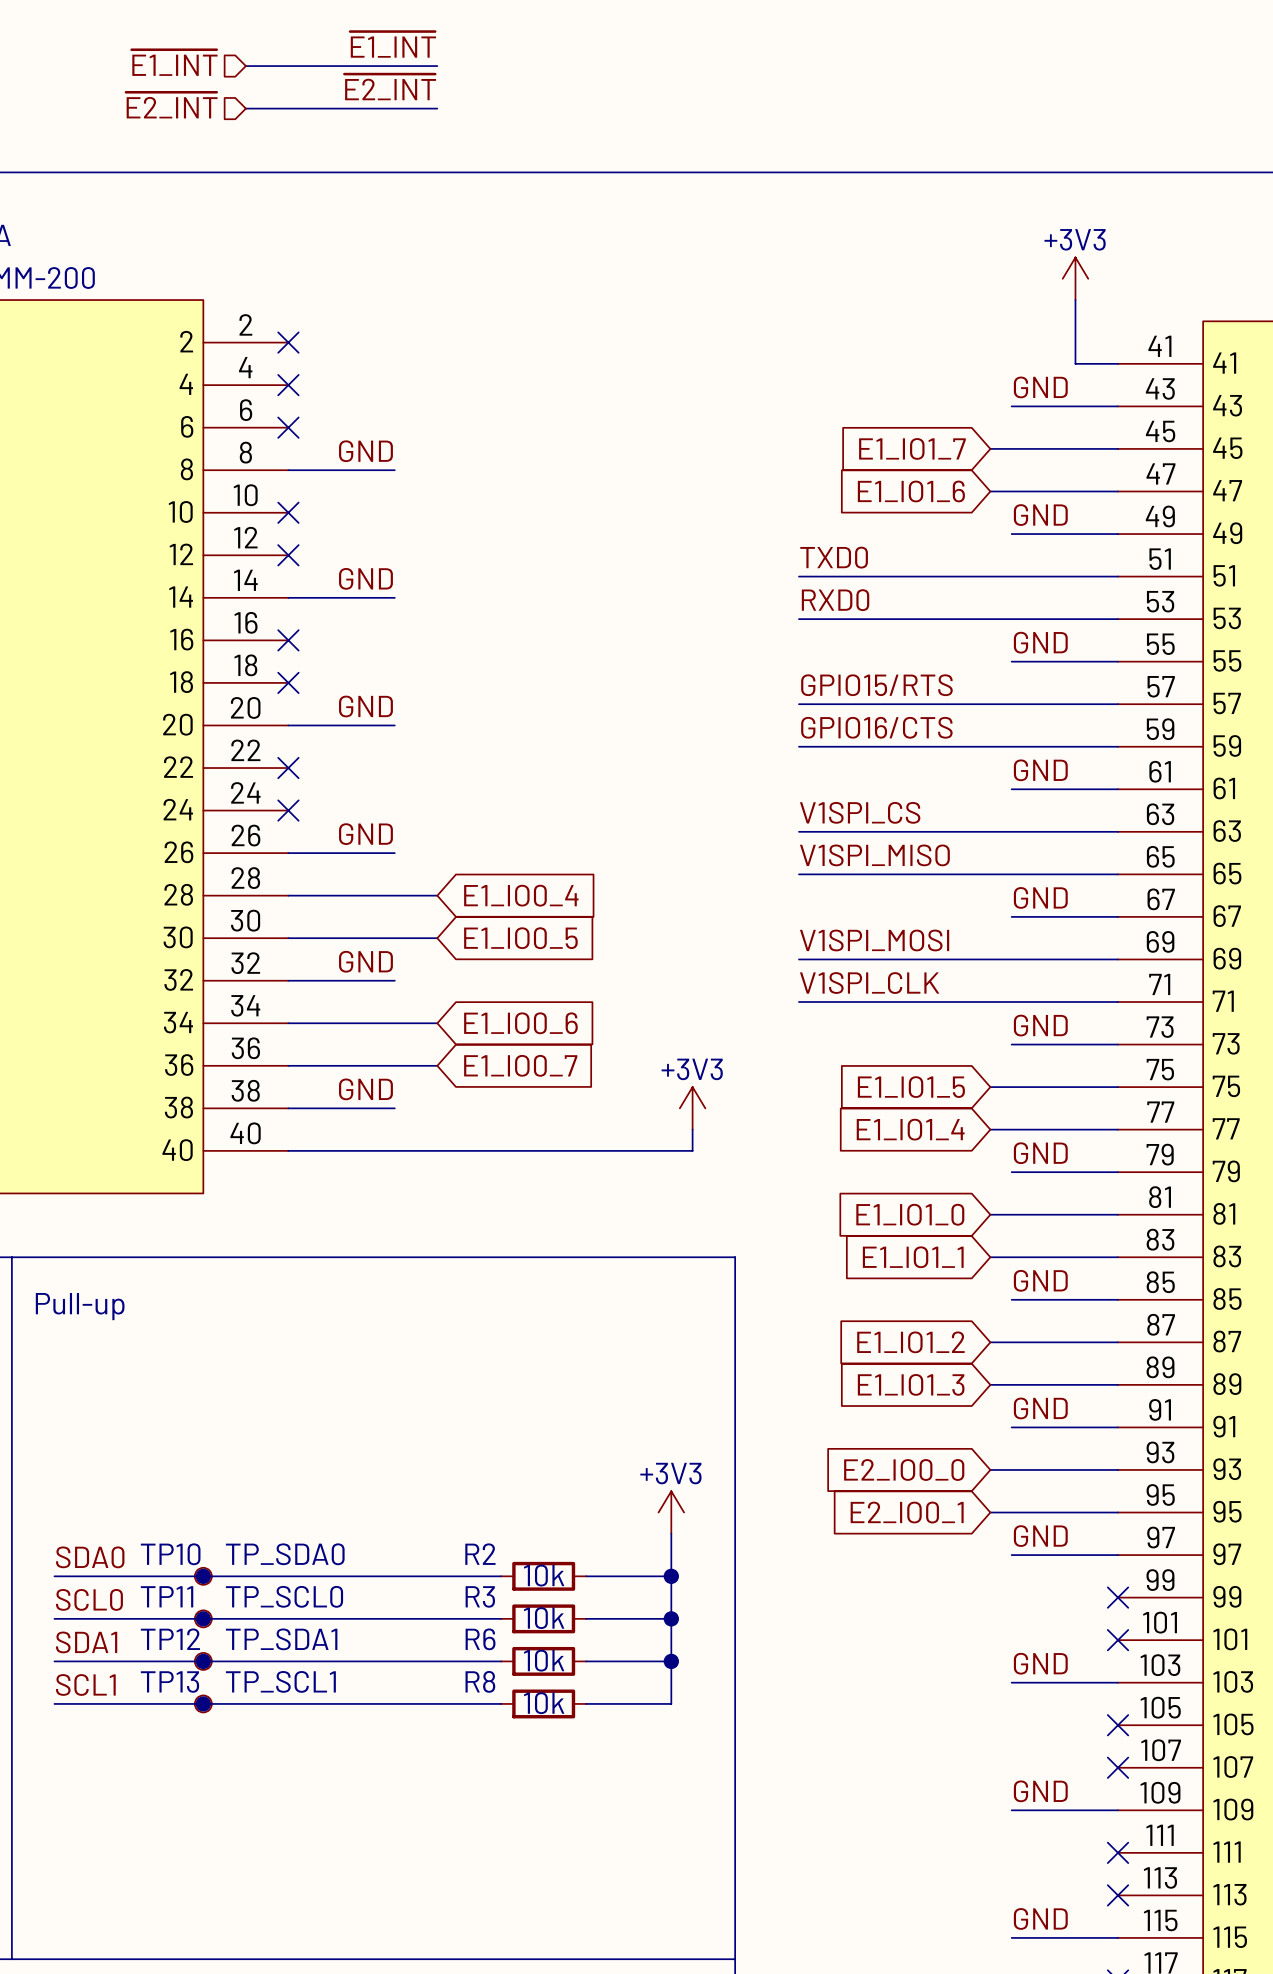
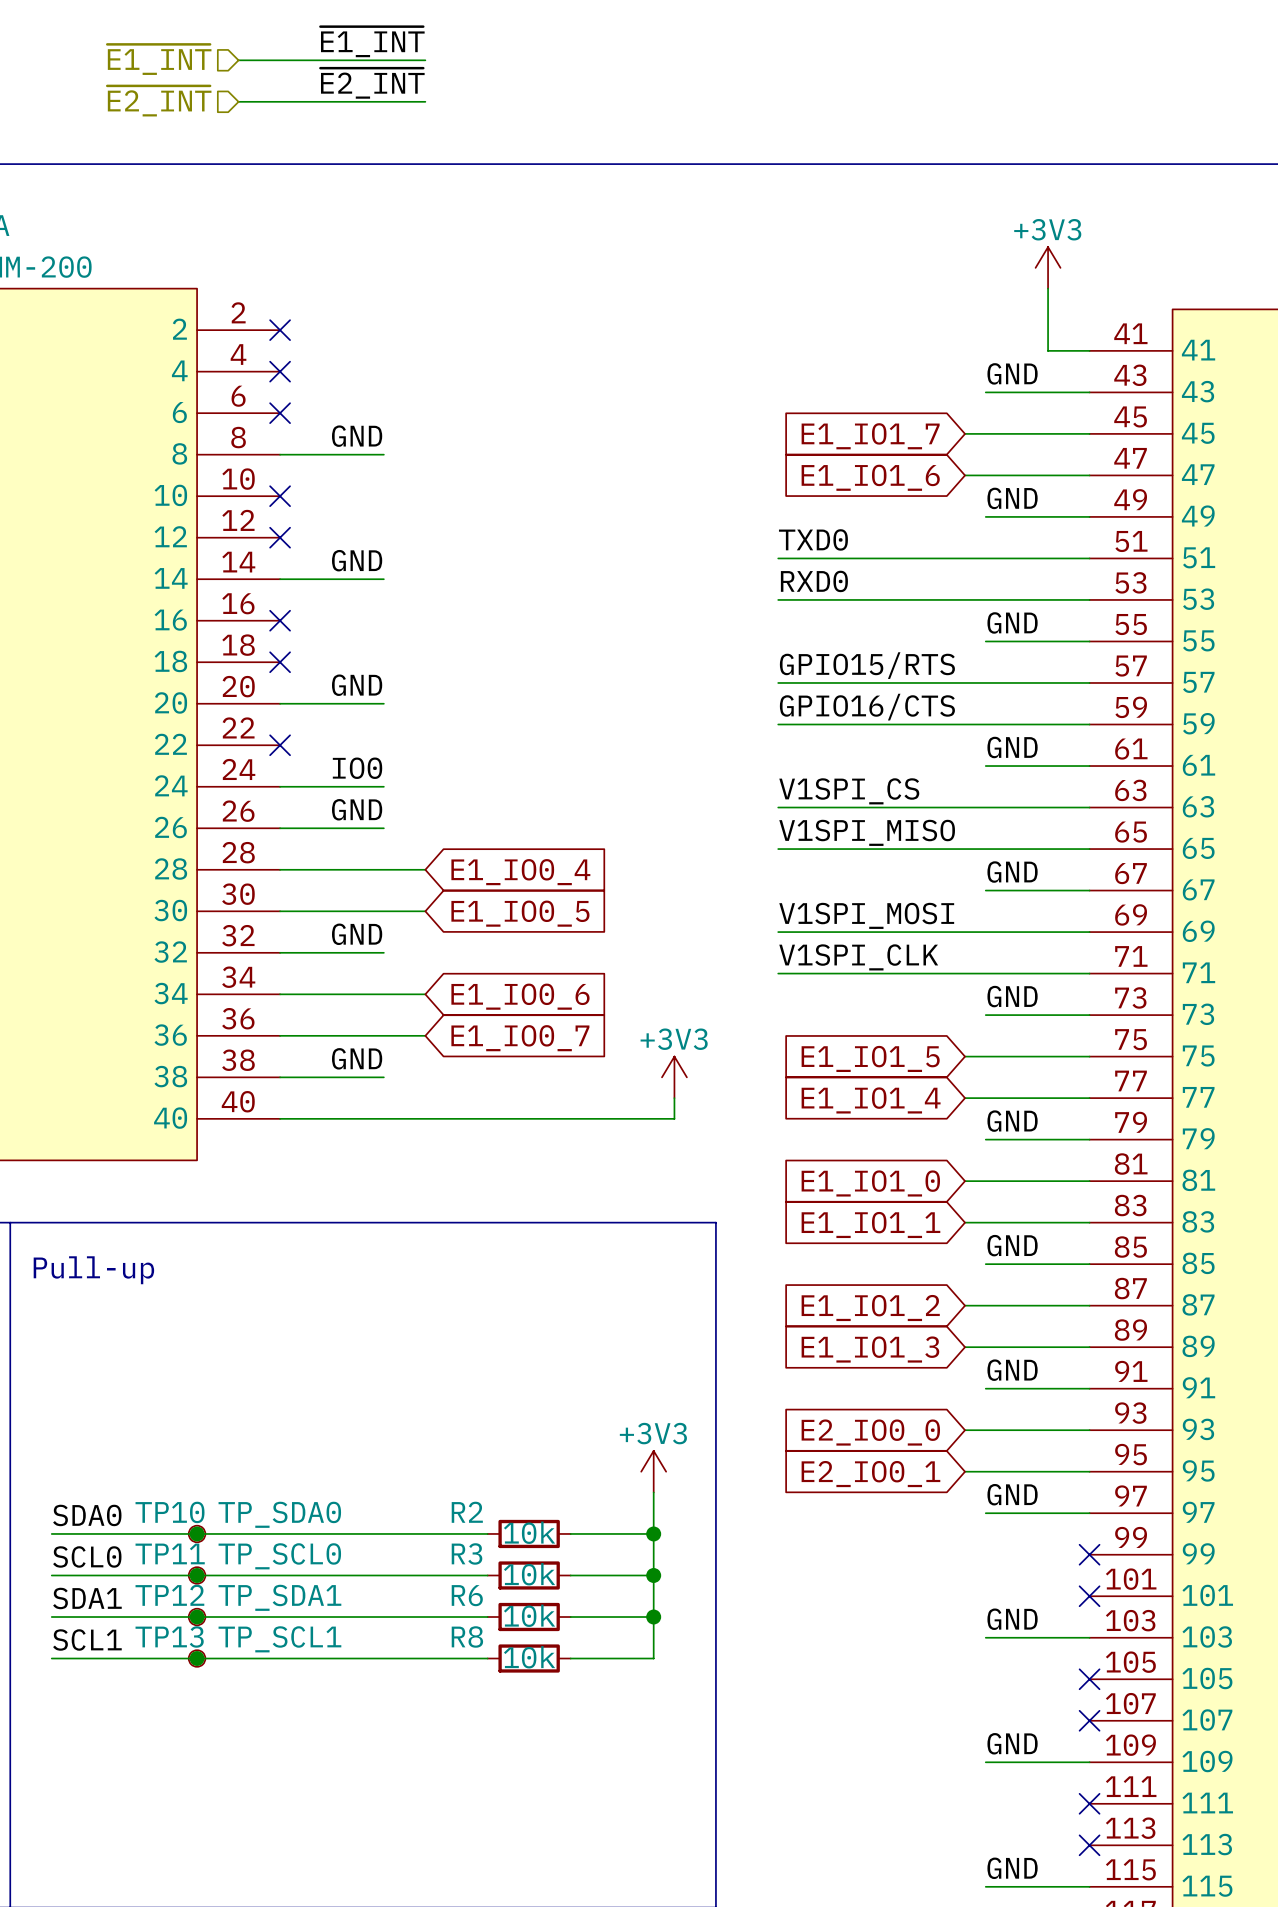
label: none -> IO0 (357, 768)
wire: none -> (280, 786) (383, 786)
no-connect mark: (288, 810) -> none

